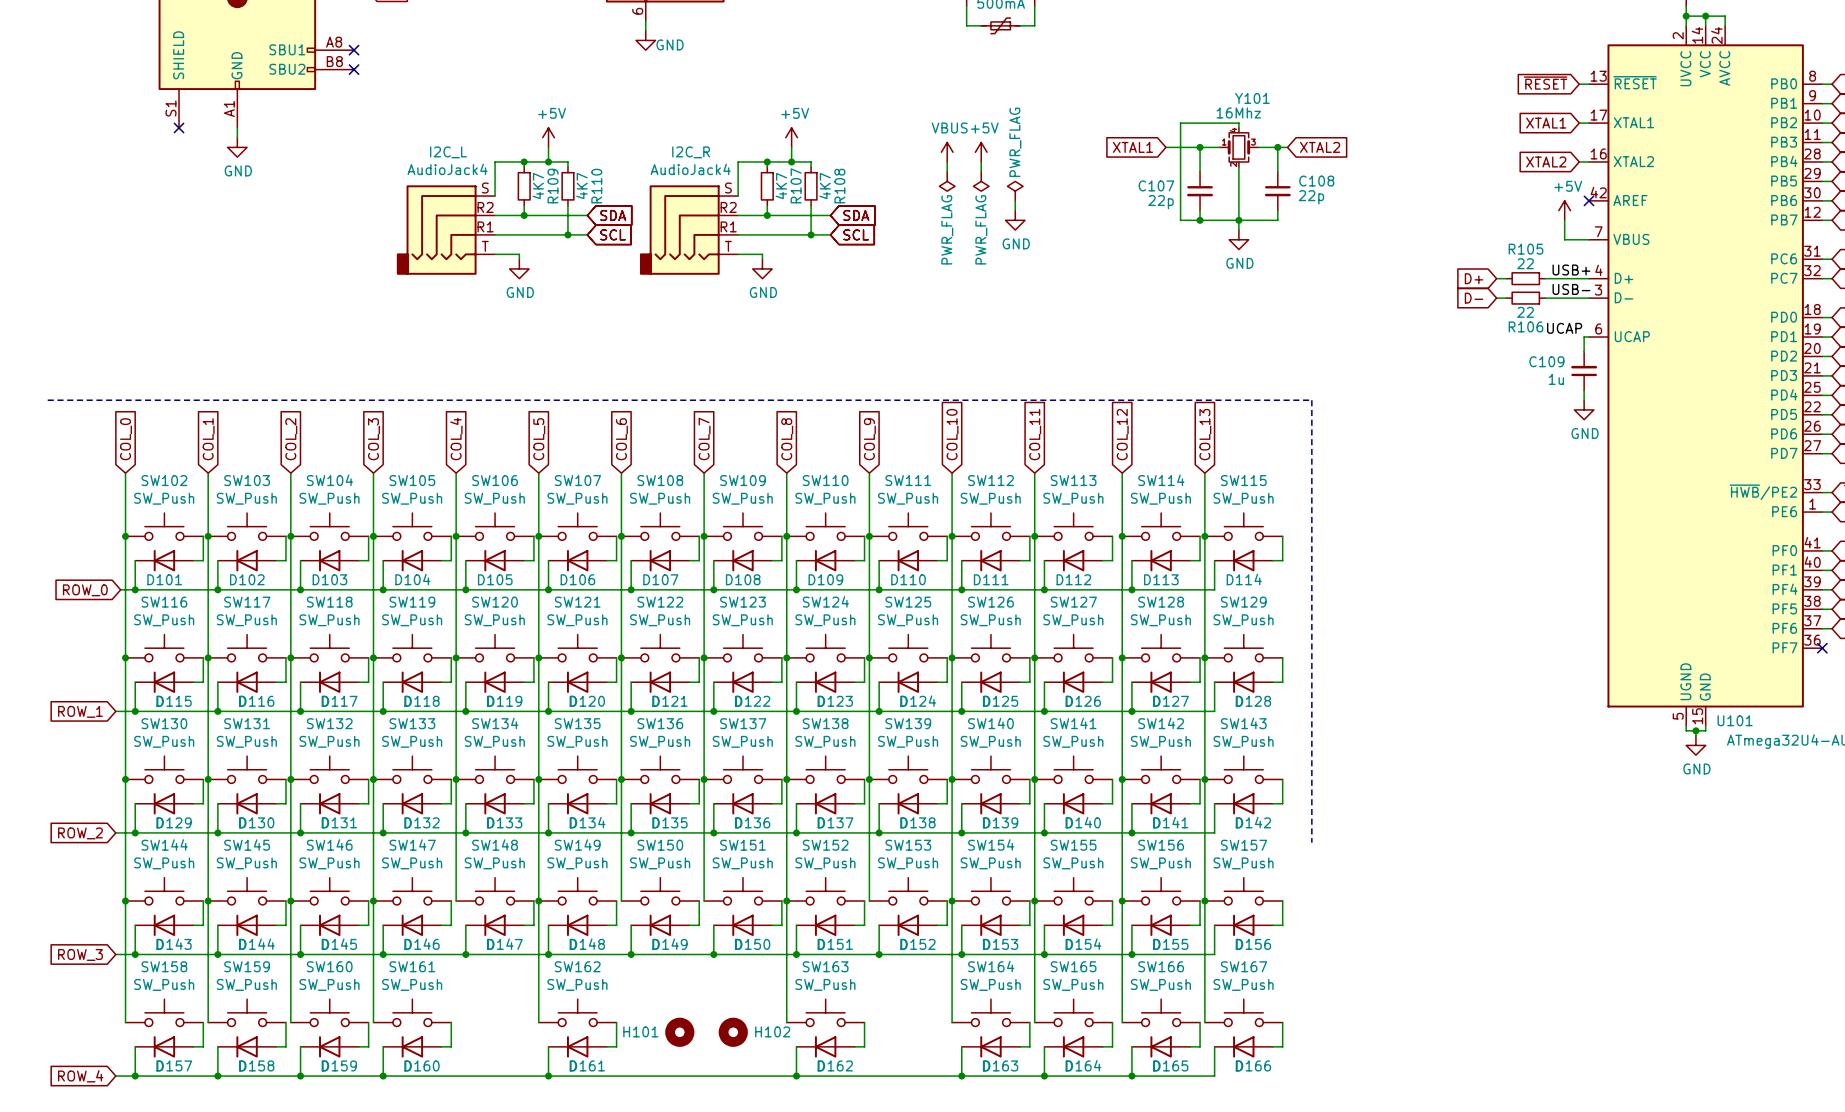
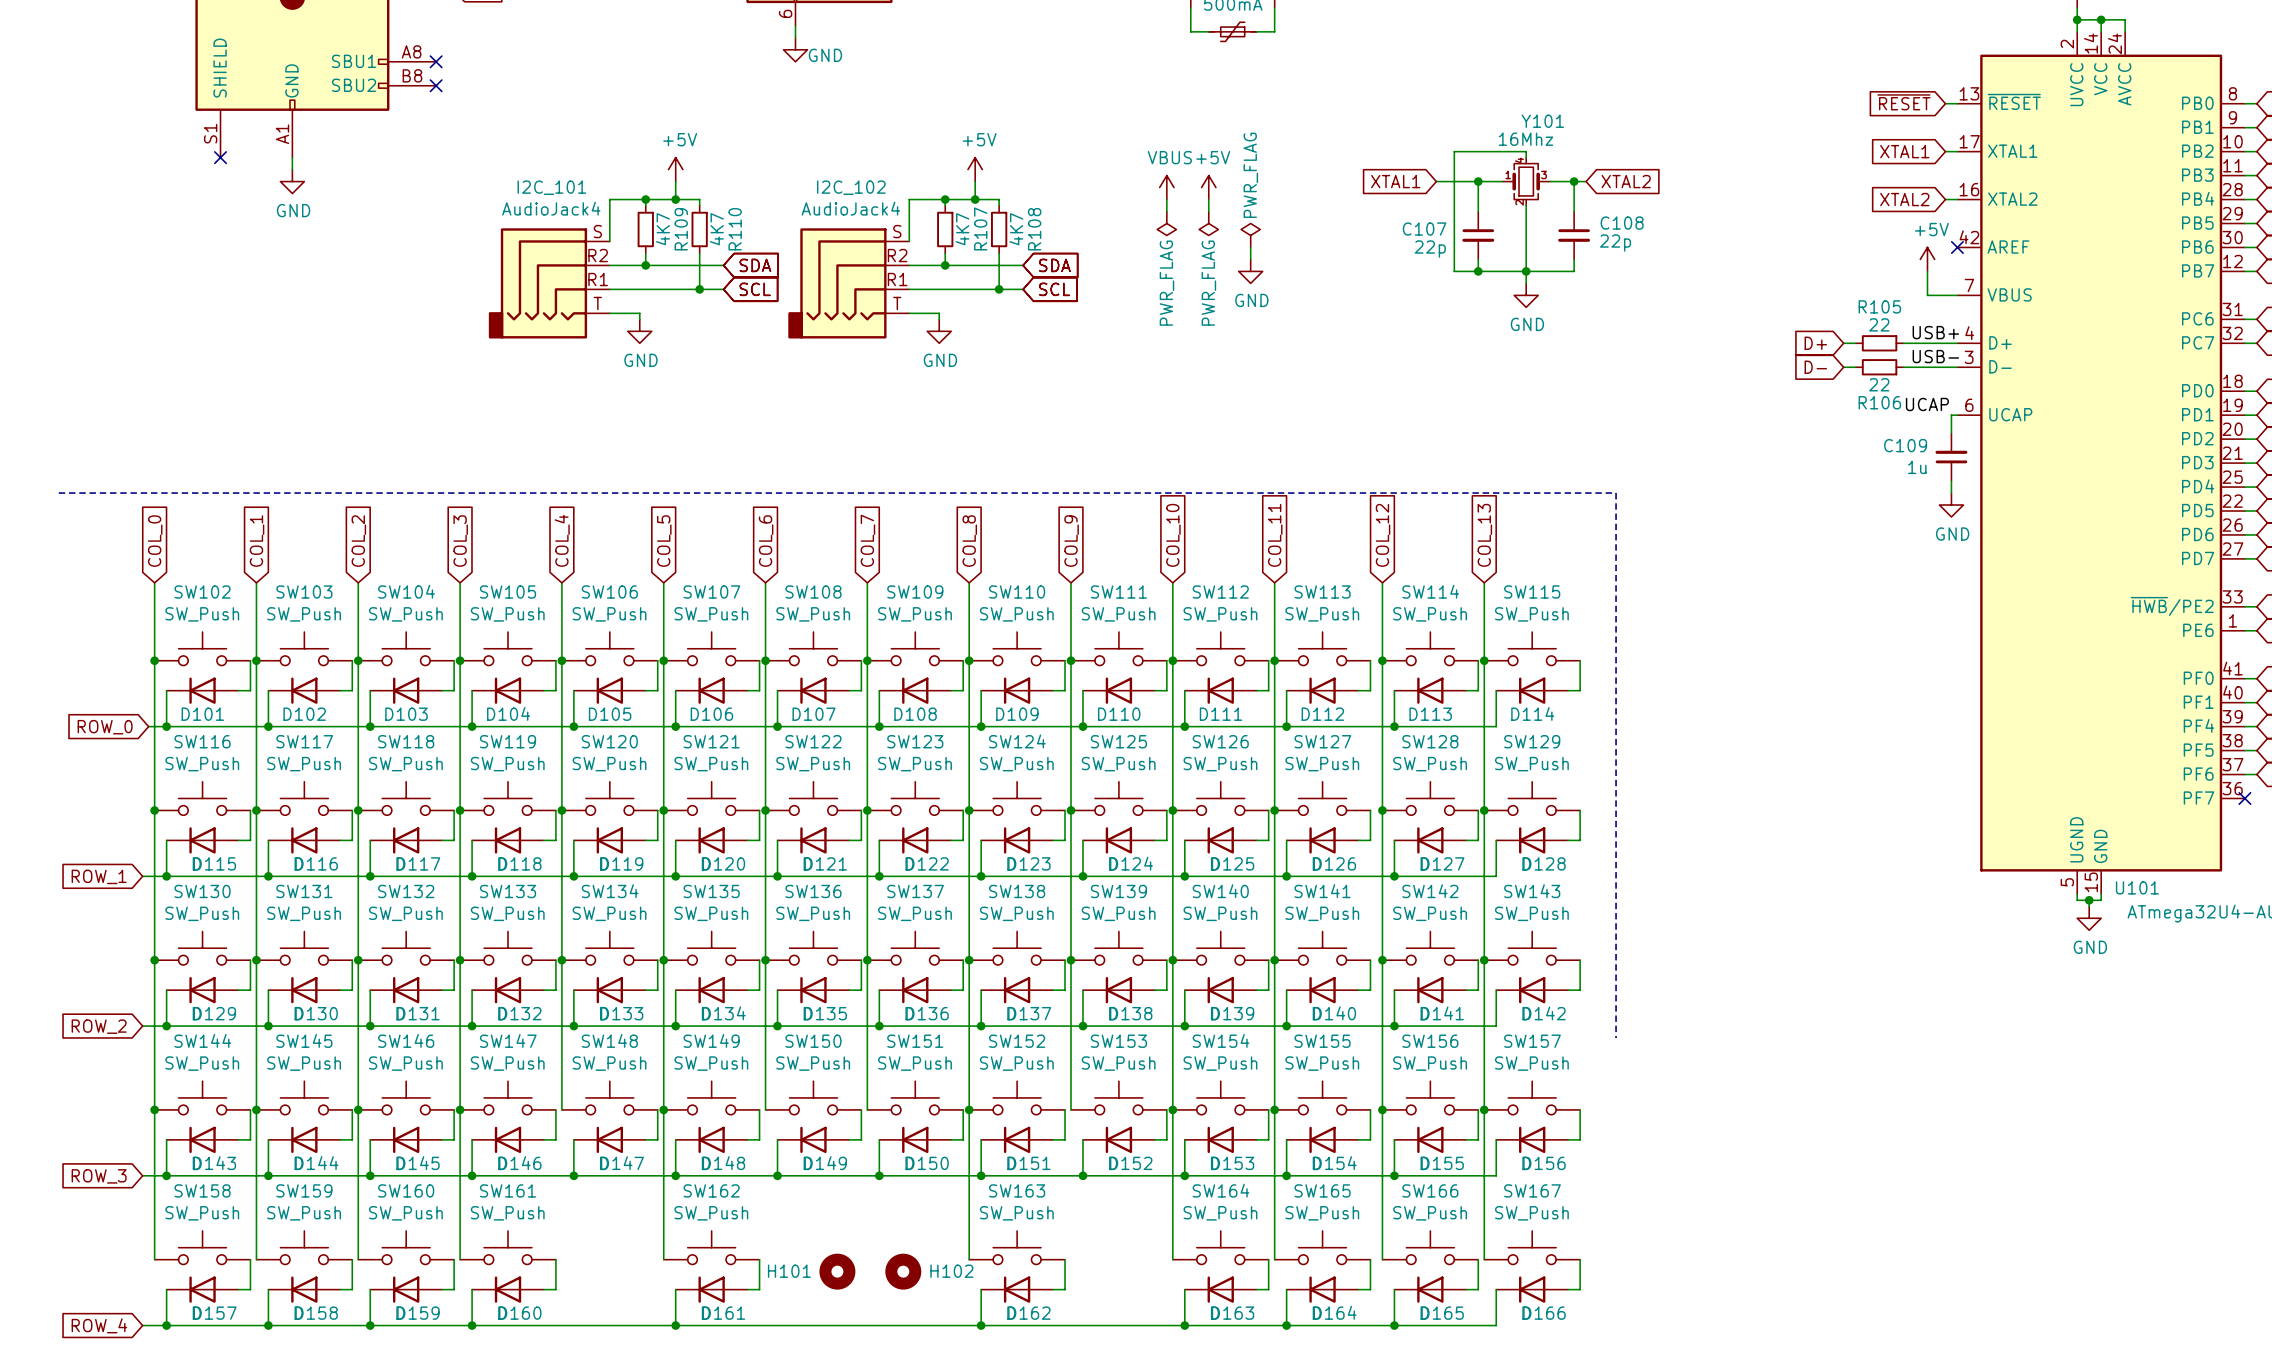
I2C_L name: I2C_L (448, 152) -> I2C_101 (551, 187)
I2C_R name: I2C_R (691, 152) -> I2C_102 (851, 187)

